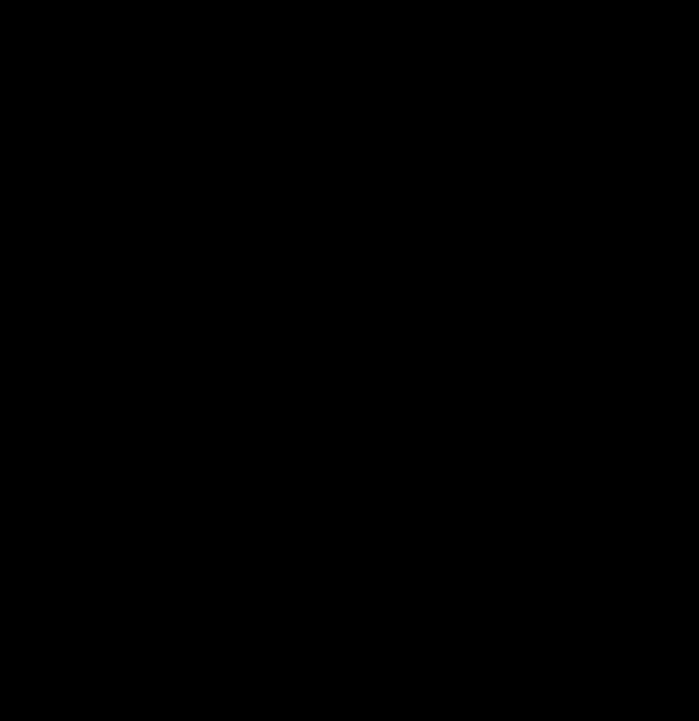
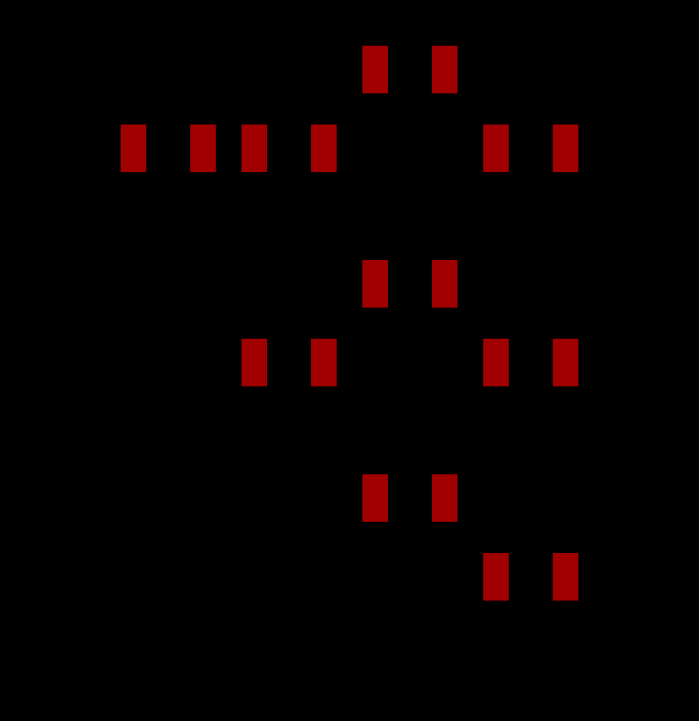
part: none -> (409, 69)
part: none -> (168, 148)
part: none -> (289, 148)
part: none -> (530, 148)
part: none -> (409, 283)
part: none -> (289, 362)
part: none -> (530, 362)
part: none -> (409, 498)
part: none -> (530, 576)

